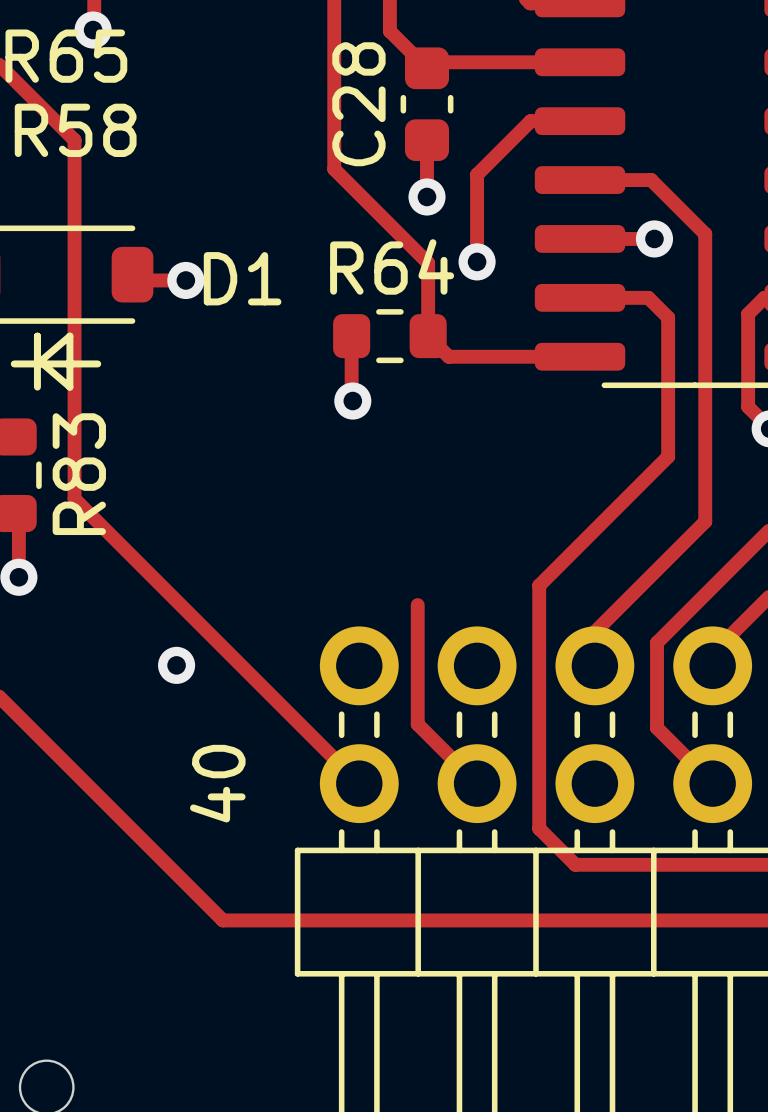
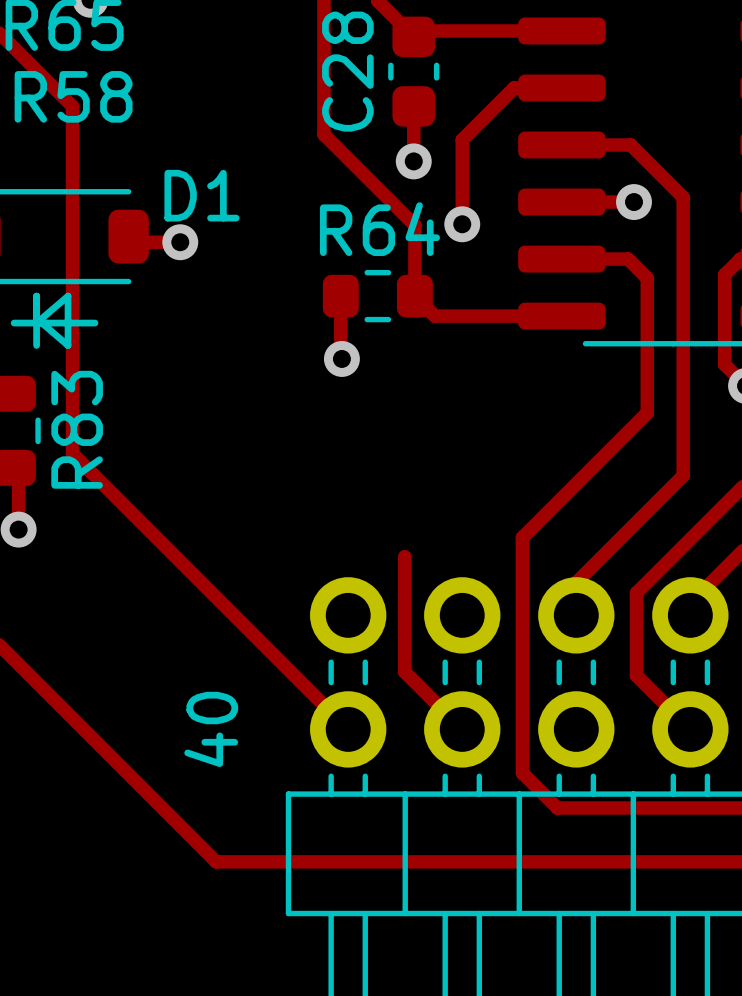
D1 name position: D1 (242, 278) -> D1 (202, 195)
via: (176, 665) -> none

